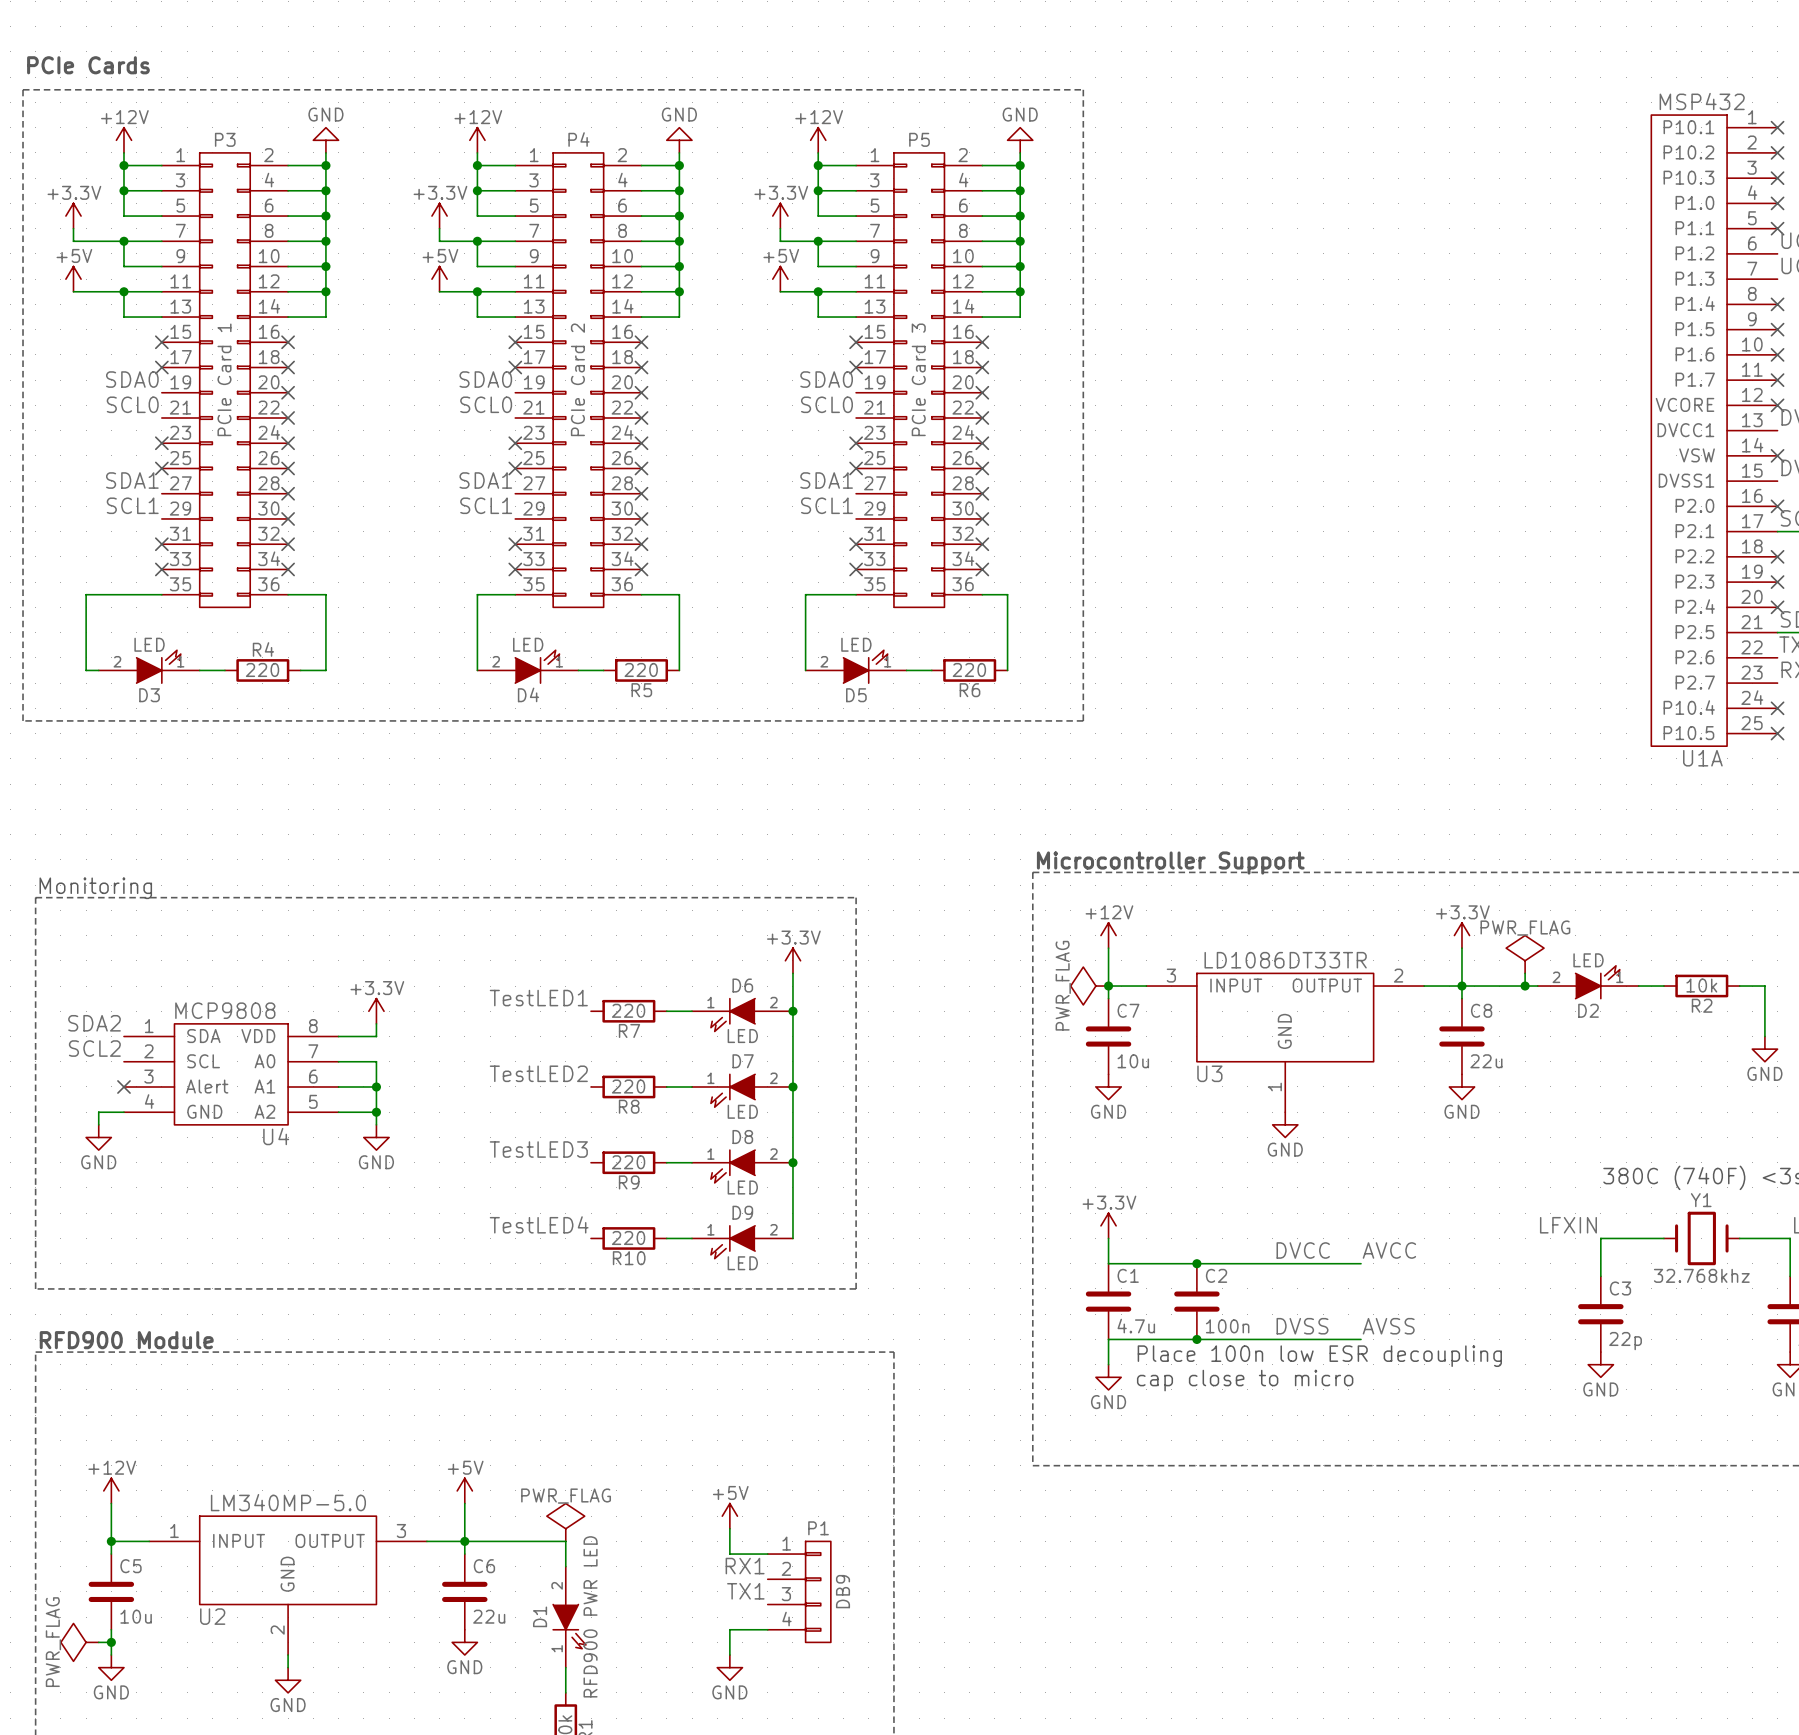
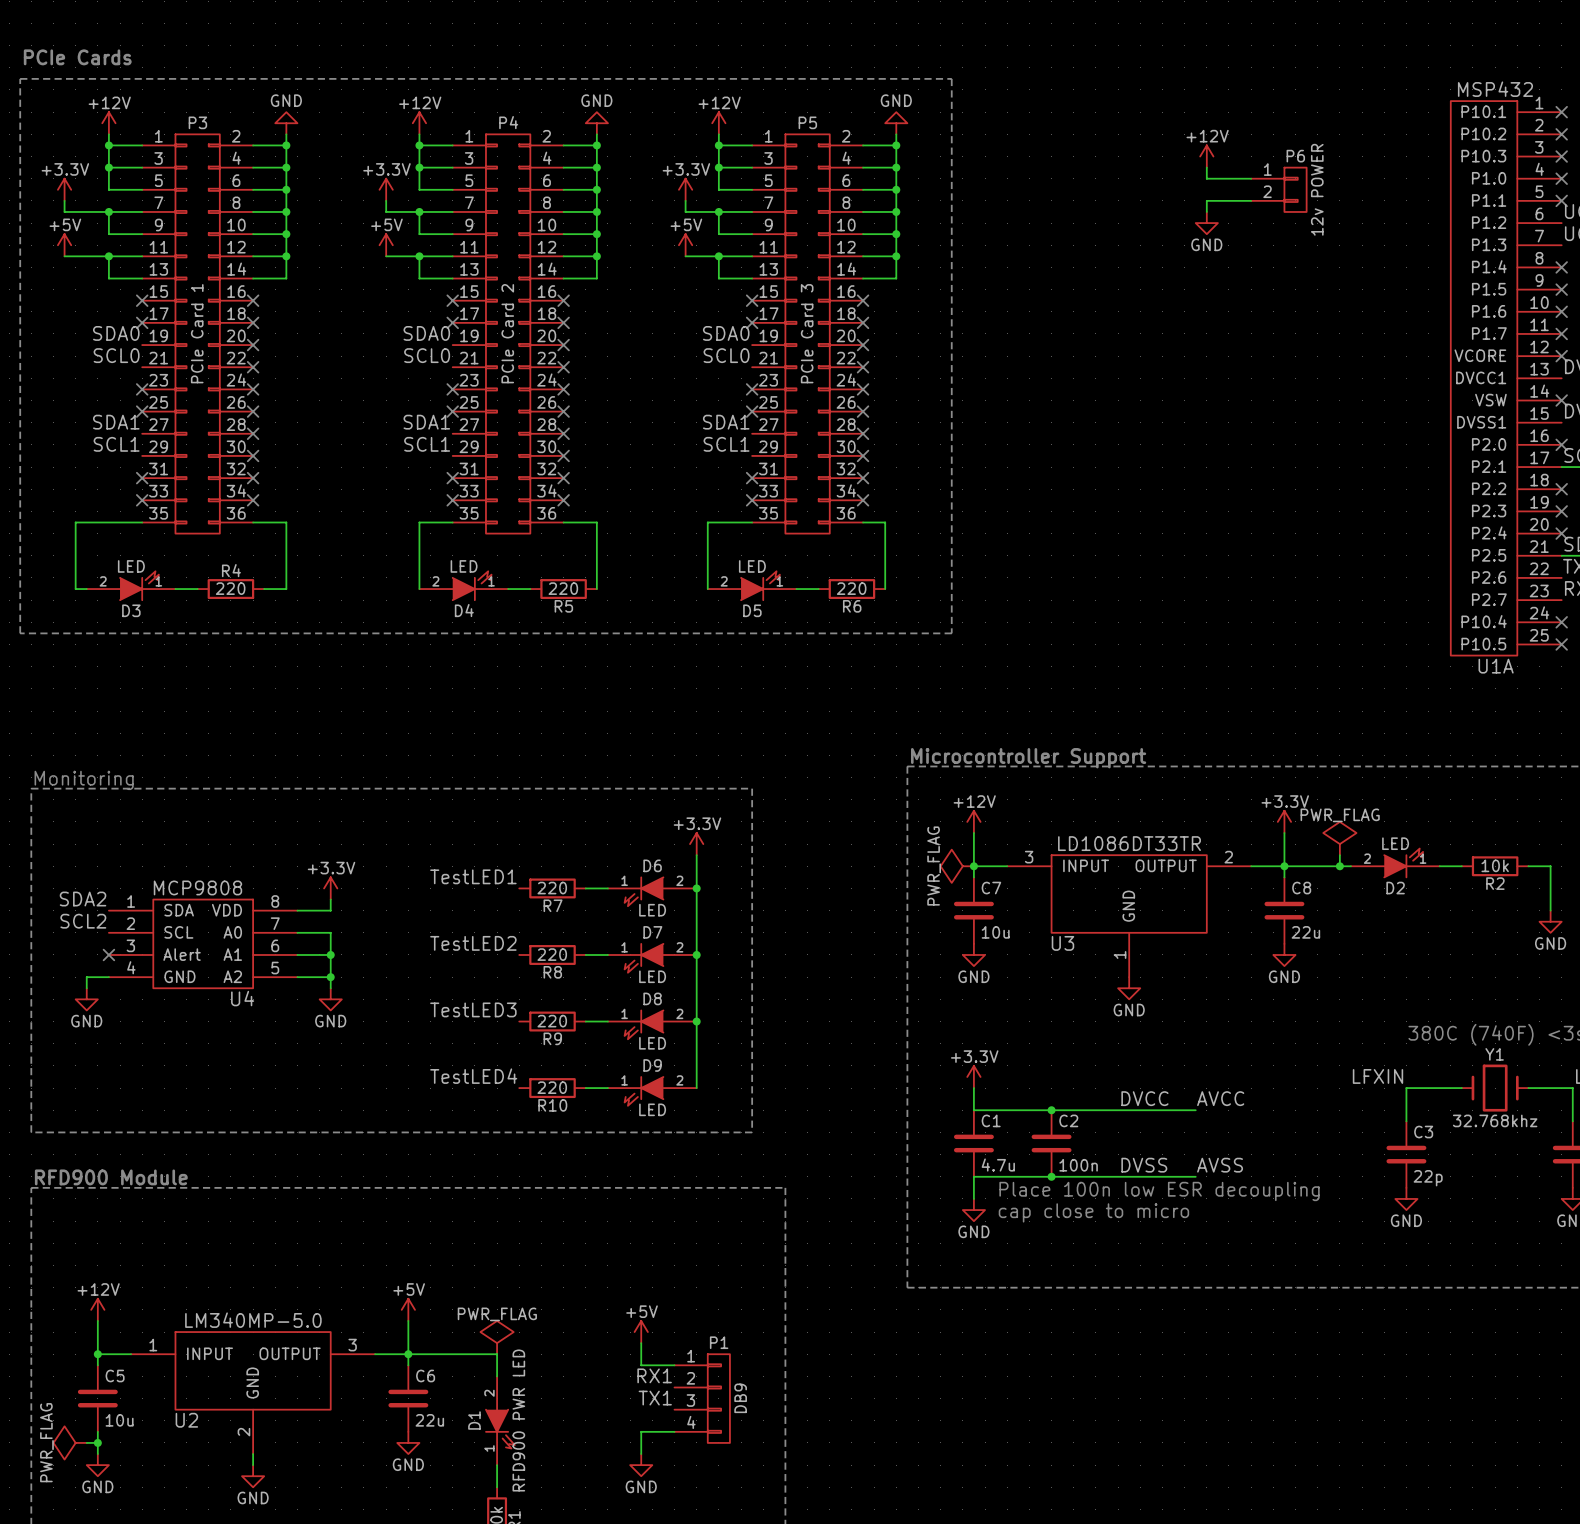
power symbol: none -> +12V (1206, 156)
wire: none -> (1206, 167) (1206, 178) (1251, 178)
P6: none -> 12v POWER (1278, 189)
wire: none -> (1251, 200) (1206, 200) (1206, 211)
power symbol: none -> GND (1206, 223)

